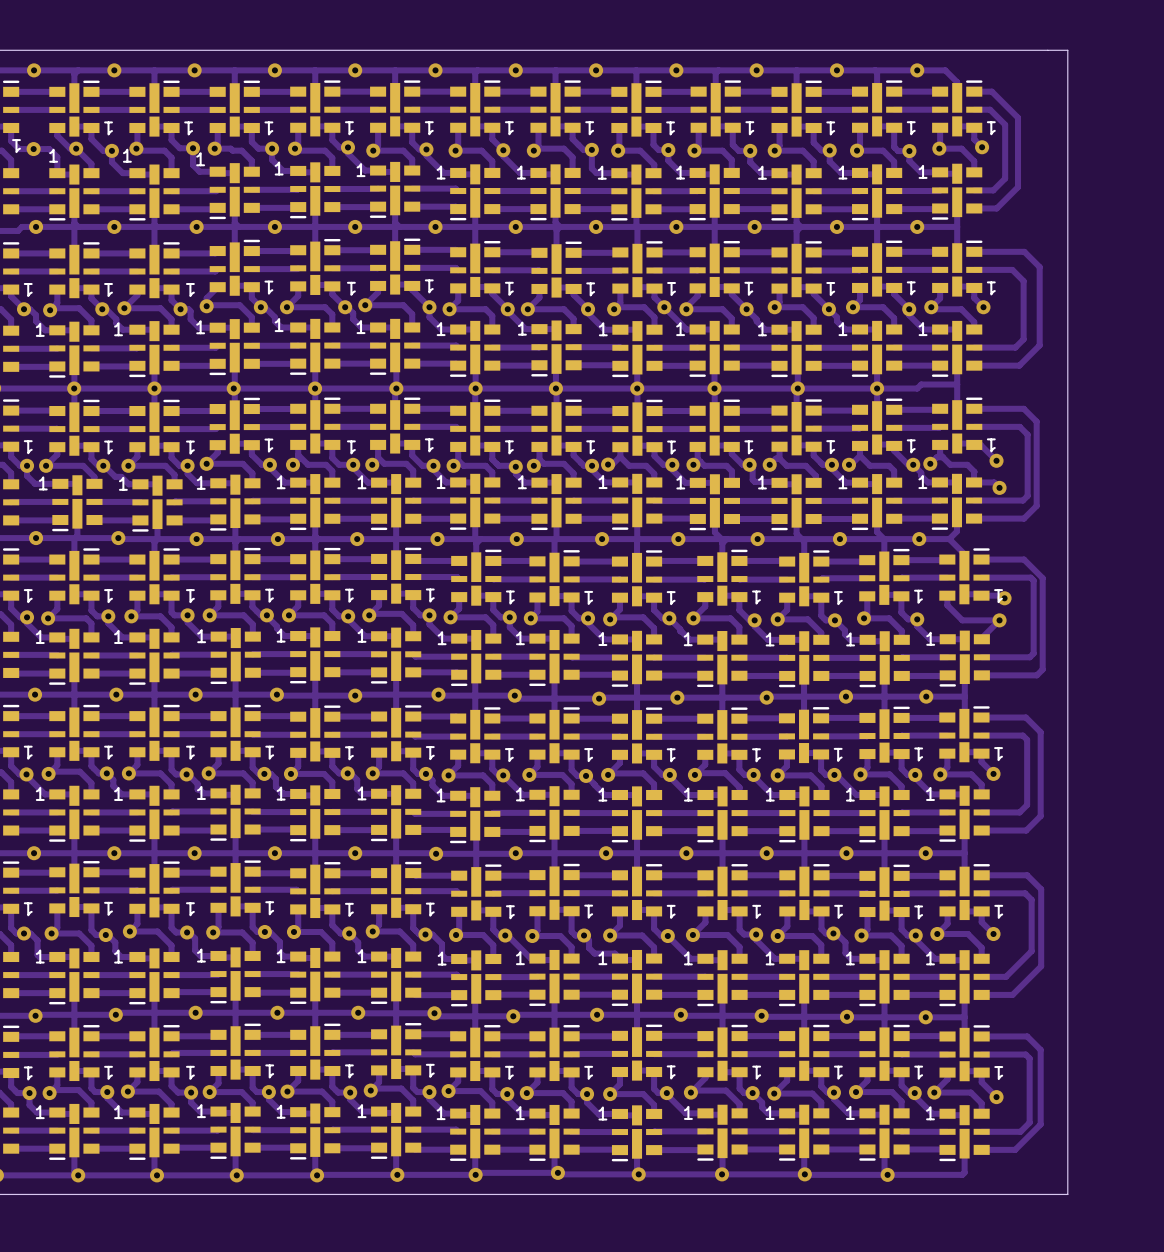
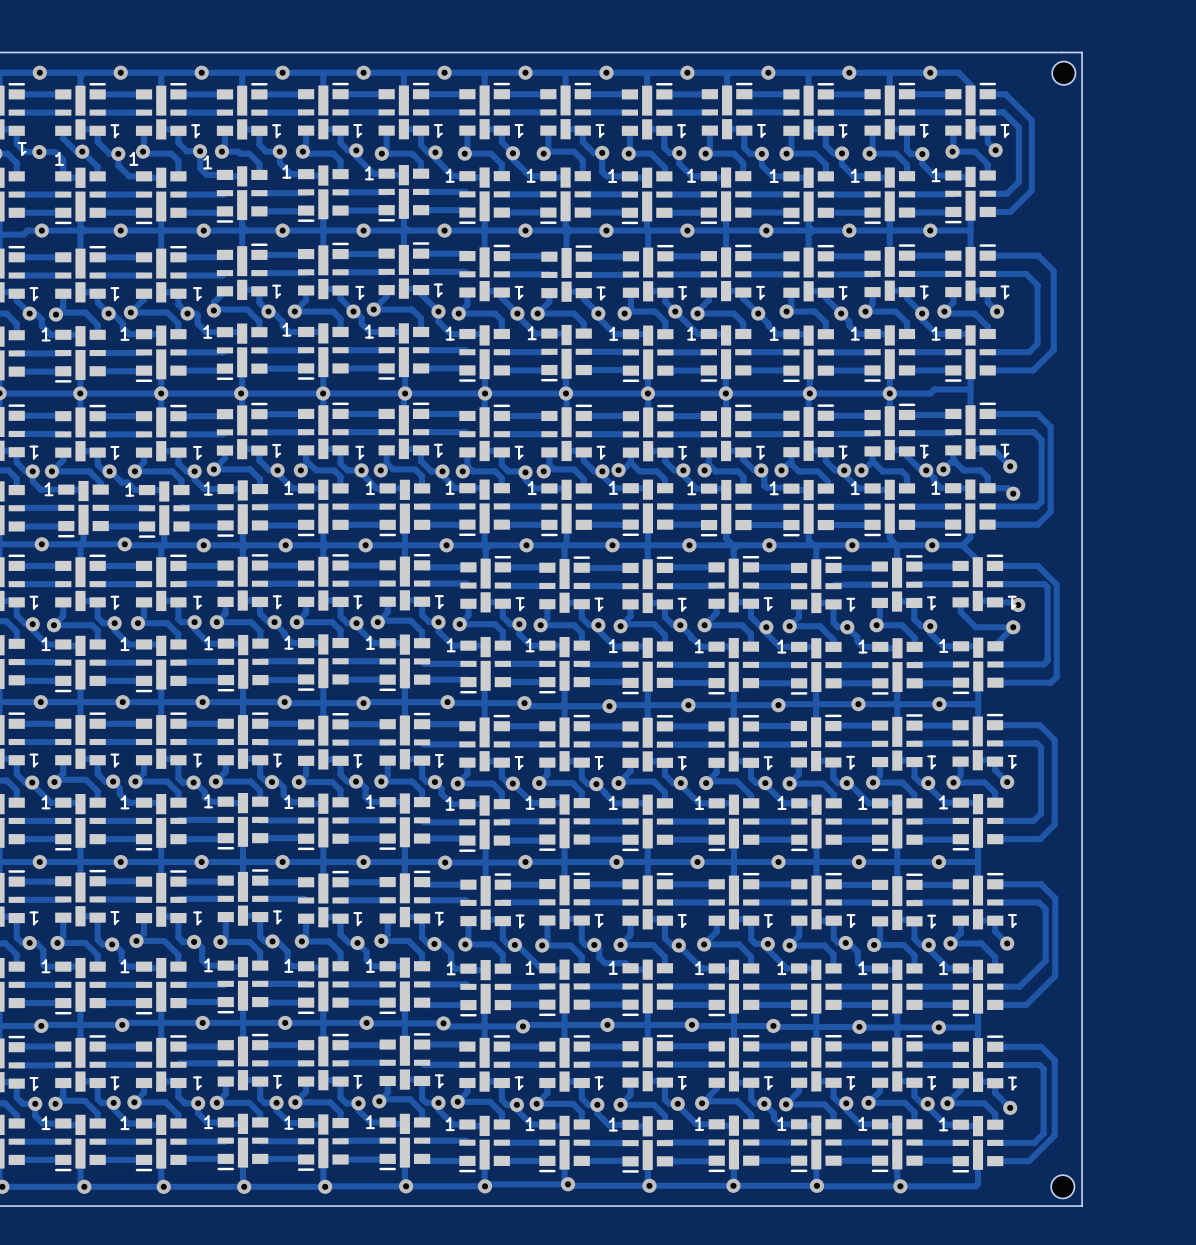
part: none -> (1063, 73)
part: none -> (1062, 1186)

